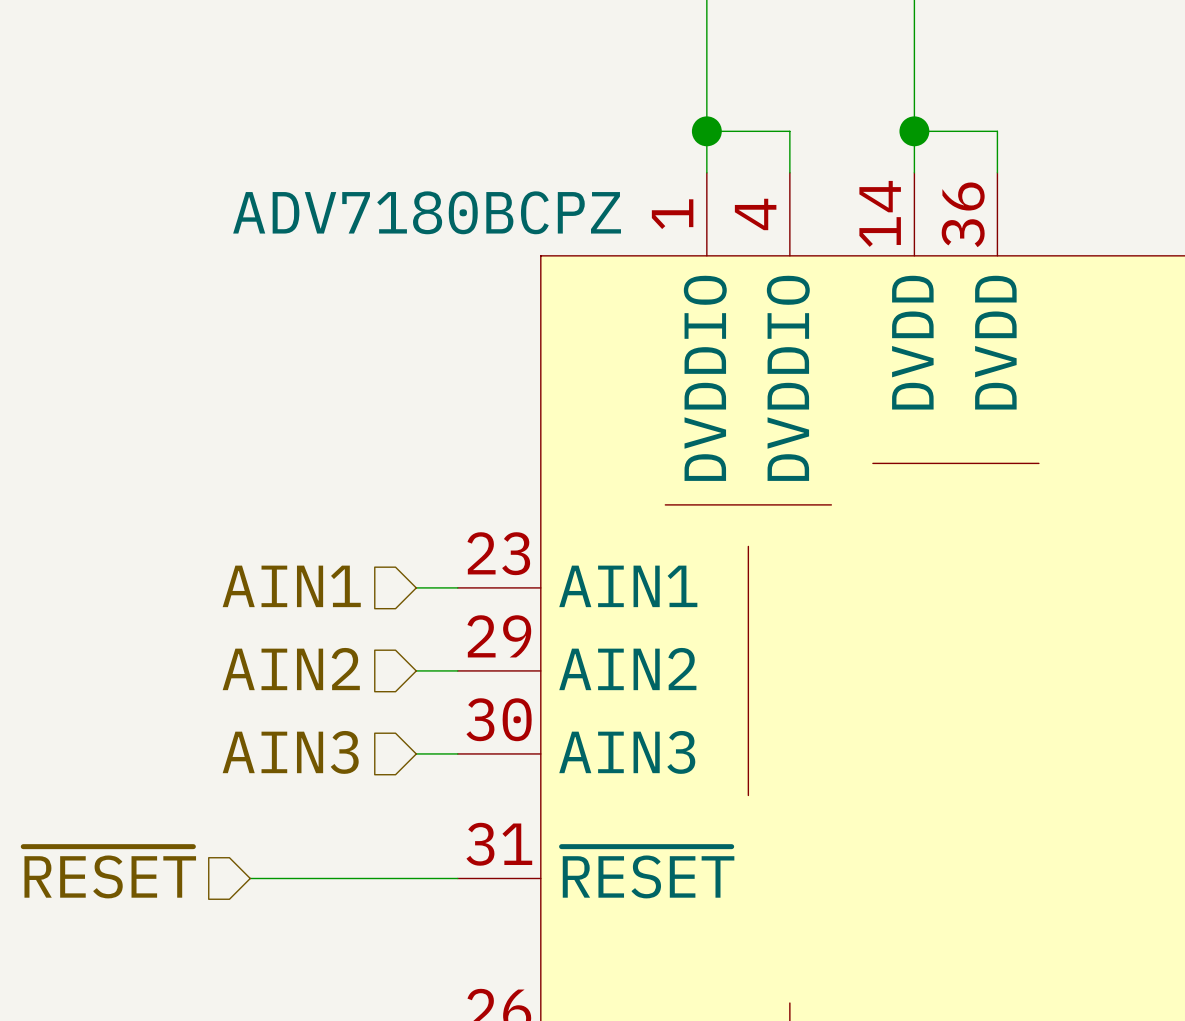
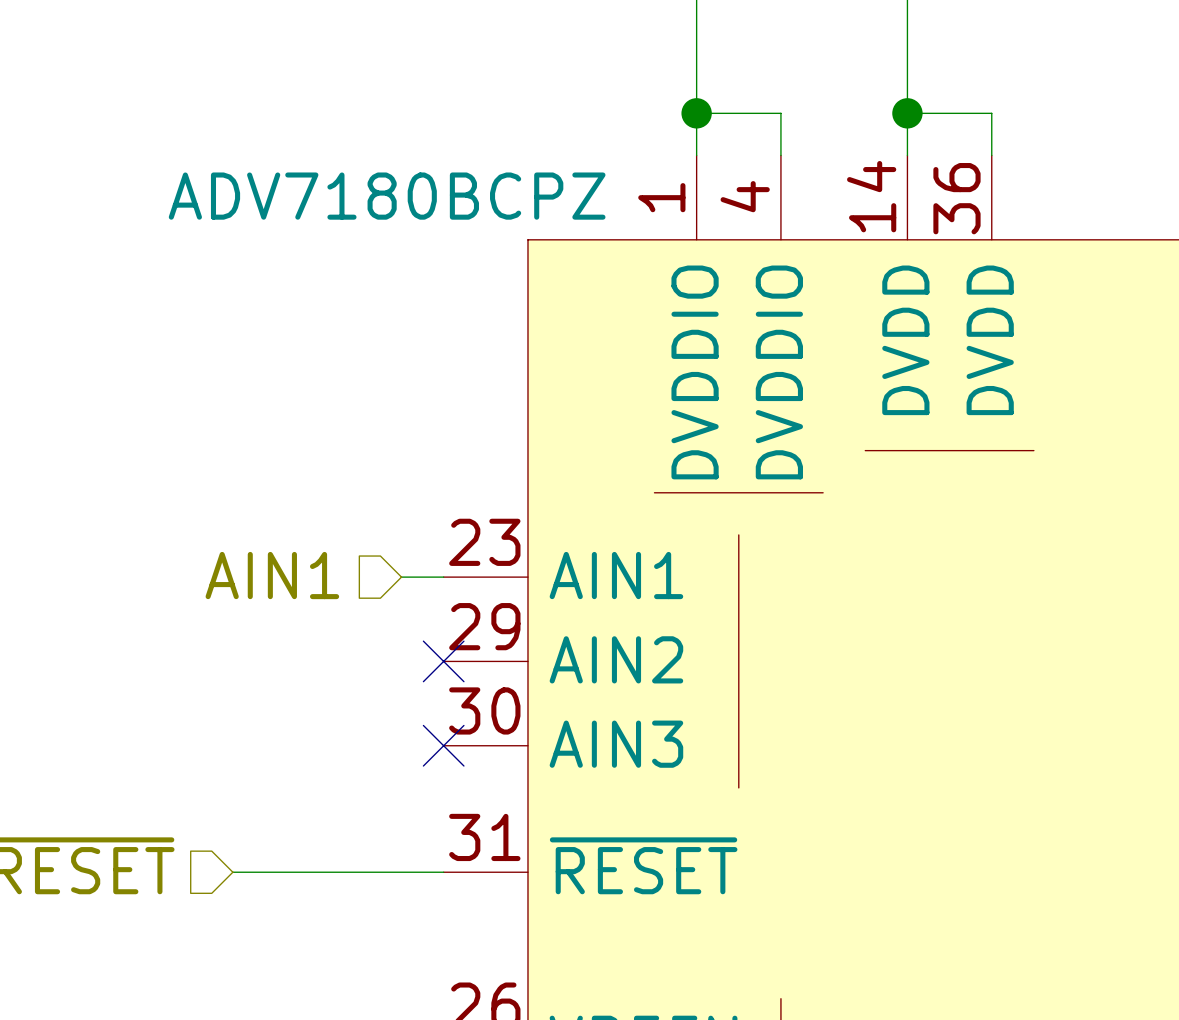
hierarchical label: AIN2 (291, 669) -> none
wire: (416, 670) (457, 670) -> none
no-connect mark: none -> (443, 661)
hierarchical label: AIN3 (290, 752) -> none
wire: (416, 753) (457, 753) -> none
no-connect mark: none -> (443, 745)

